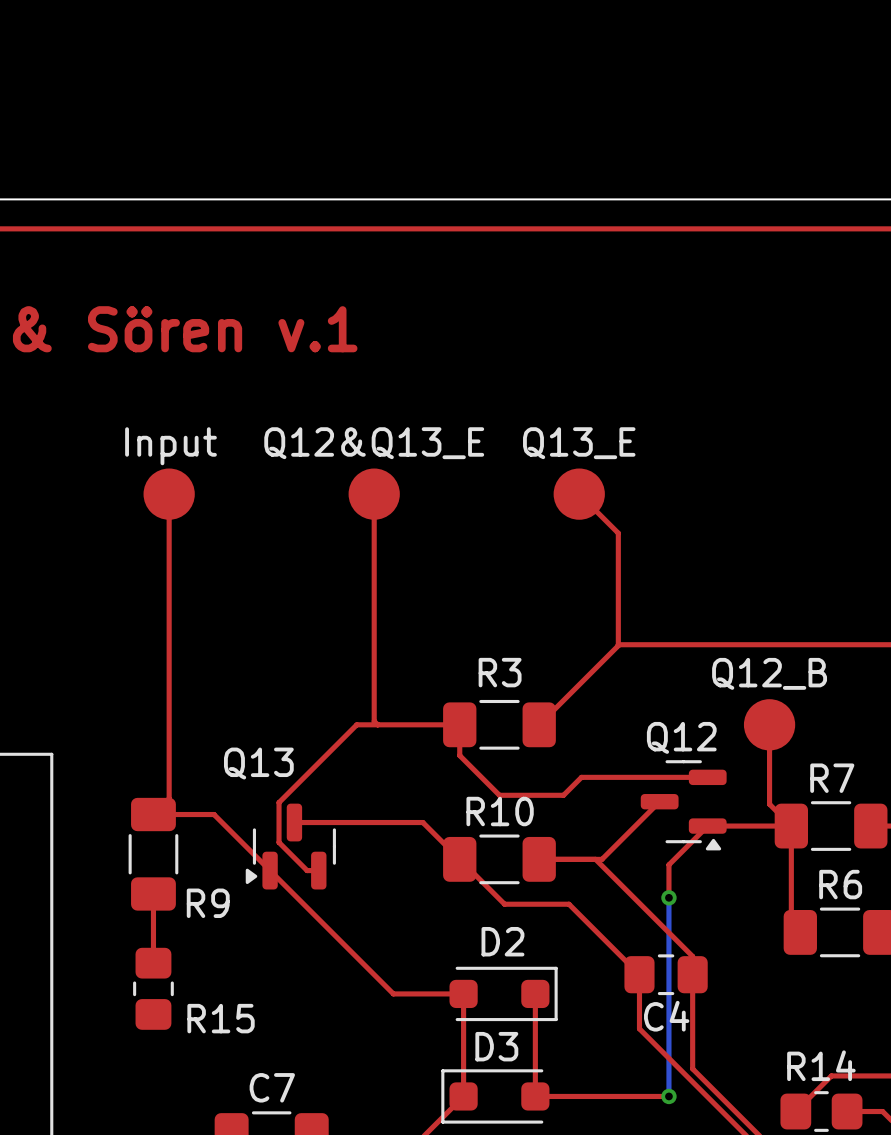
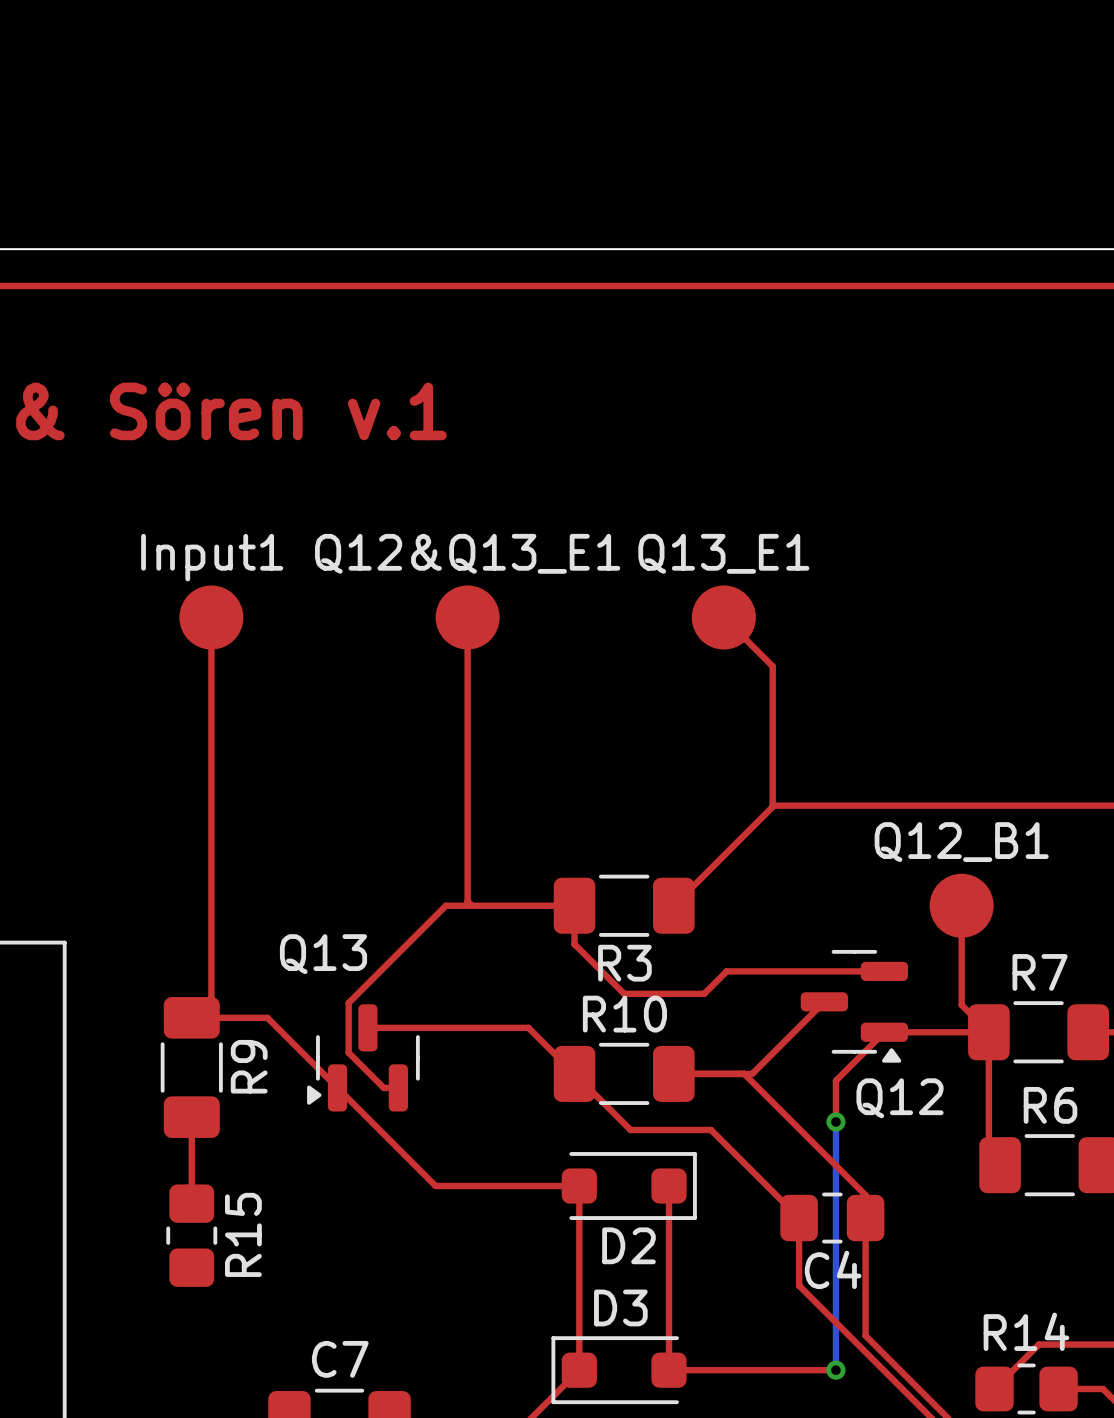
Q12&Q13_E name: Q12&Q13_E (374, 443) -> Q12&Q13_E1 (467, 553)
Q13_E name: Q13_E (579, 443) -> Q13_E1 (723, 553)
Input name: Input (170, 446) -> Input1 (212, 557)
R3 name position: R3 (500, 672) -> R3 (624, 963)
Q12_B name: Q12_B (769, 673) -> Q12_B1 (961, 842)
Q12 name position: Q12 (681, 737) -> Q12 (900, 1098)
R9 name rotation: 0° (208, 903) -> 90° counterclockwise (249, 1066)
D2 name position: D2 (502, 941) -> D2 (629, 1245)
top track: (348, 949) (393, 993) (463, 993) -> (435, 1186) (579, 1186) (579, 1242)
top track: none -> (669, 1186) (669, 1242)
D2 position: (503, 993) -> (629, 1186)
R15 name rotation: 0° (221, 1018) -> 90° counterclockwise (243, 1234)

